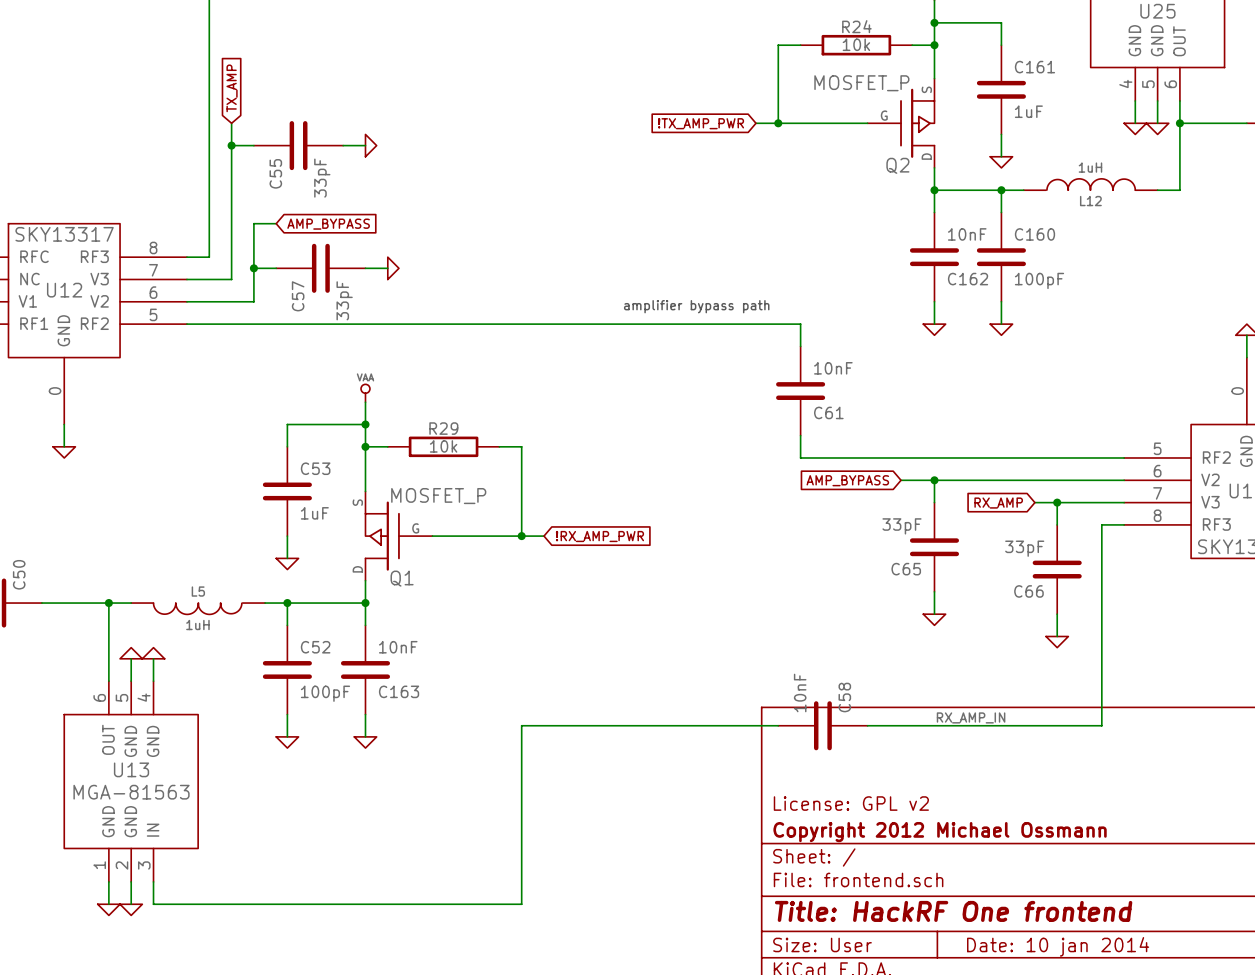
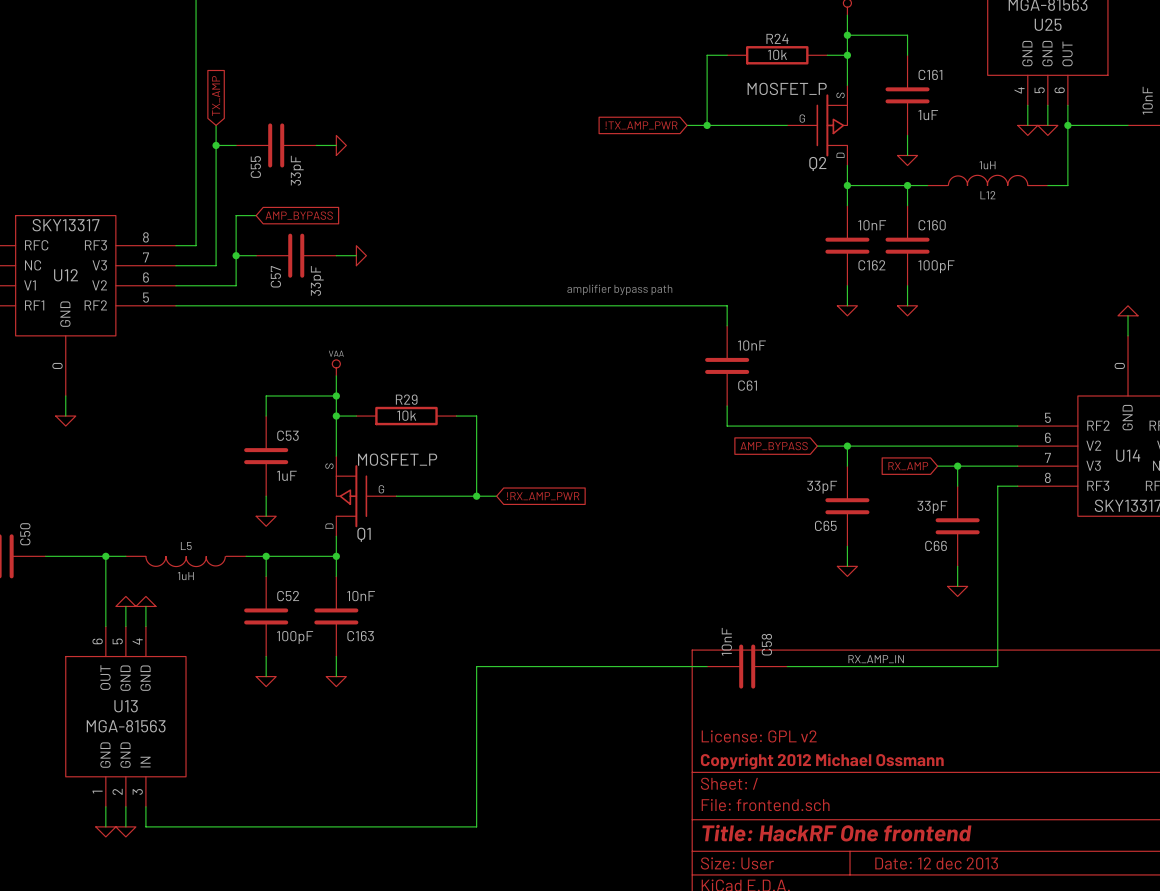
title block: Date: 10 jan 2014 (1058, 946) -> Date: 12 dec 2013 (936, 863)

